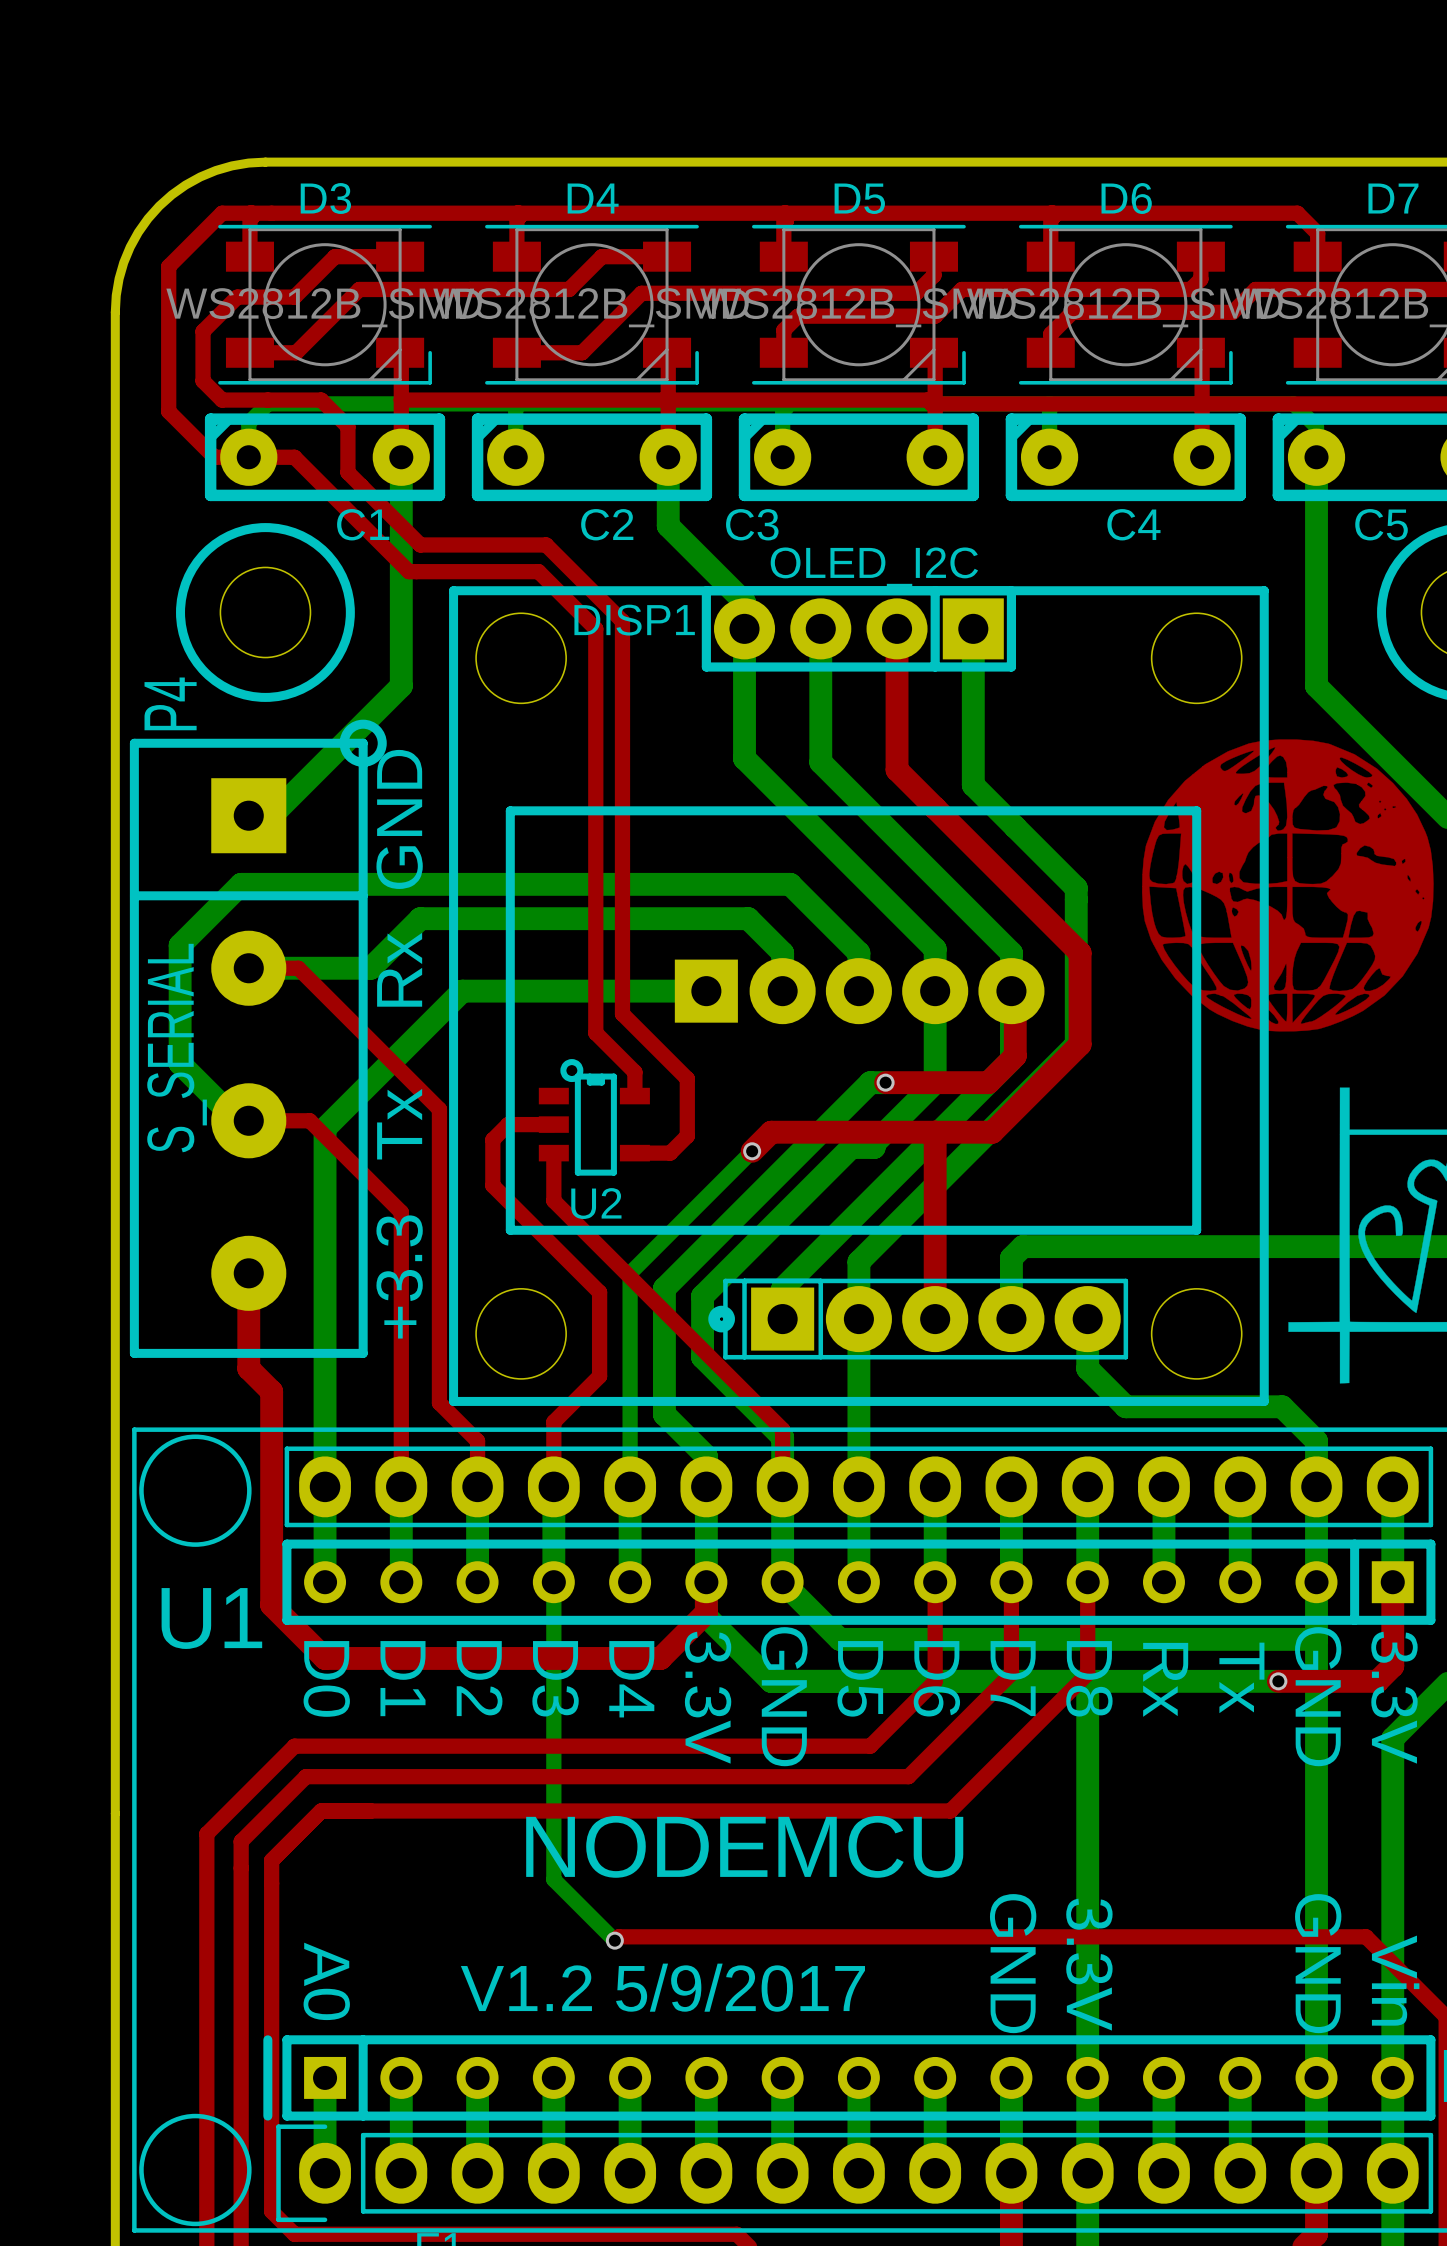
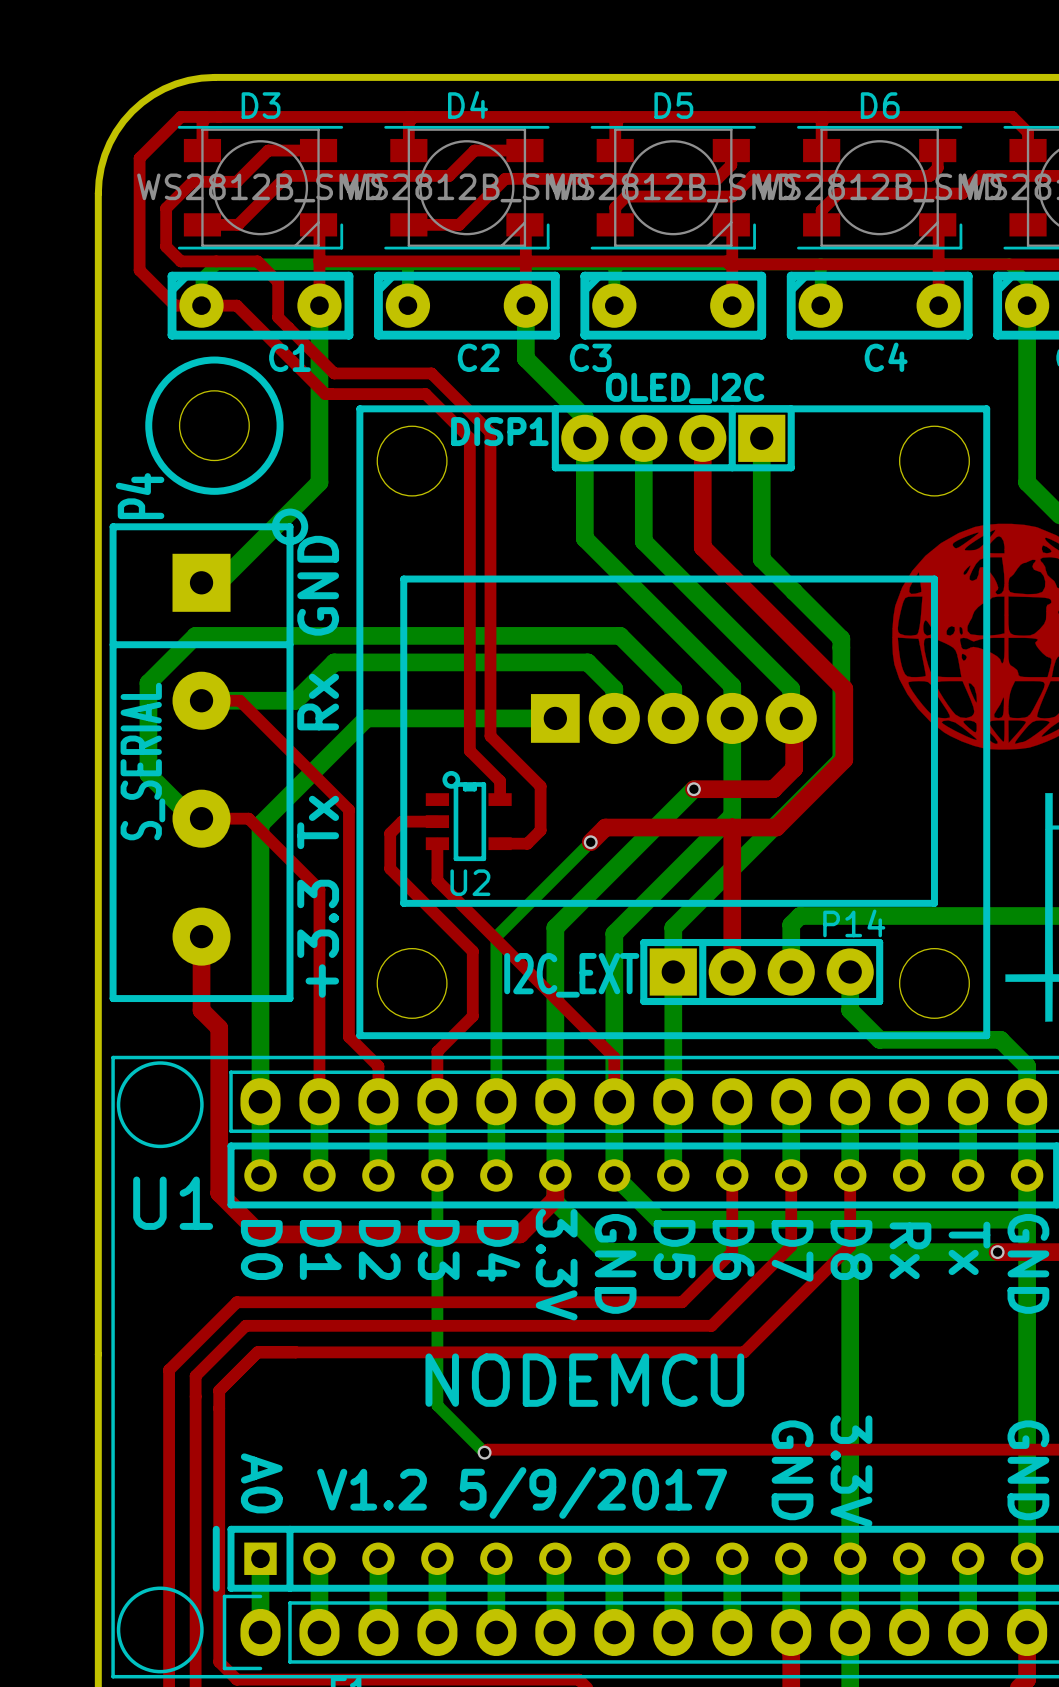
bottom track: (1011, 991) (1011, 1059) (782, 1288) -> (732, 789) (732, 815) (614, 933) (614, 948)
bottom track: (885, 1082) (870, 1082) (664, 1288) (664, 1414) (706, 1456) -> (693, 789) (555, 927) (555, 1078)
bottom track: (935, 1082) (874, 1143) (874, 1147) (851, 1147) (702, 1296) (702, 1357) (782, 1437) -> (614, 972) (614, 1063)
part: (918, 1319) -> none
P14: none -> I2C_EXT (761, 972)

